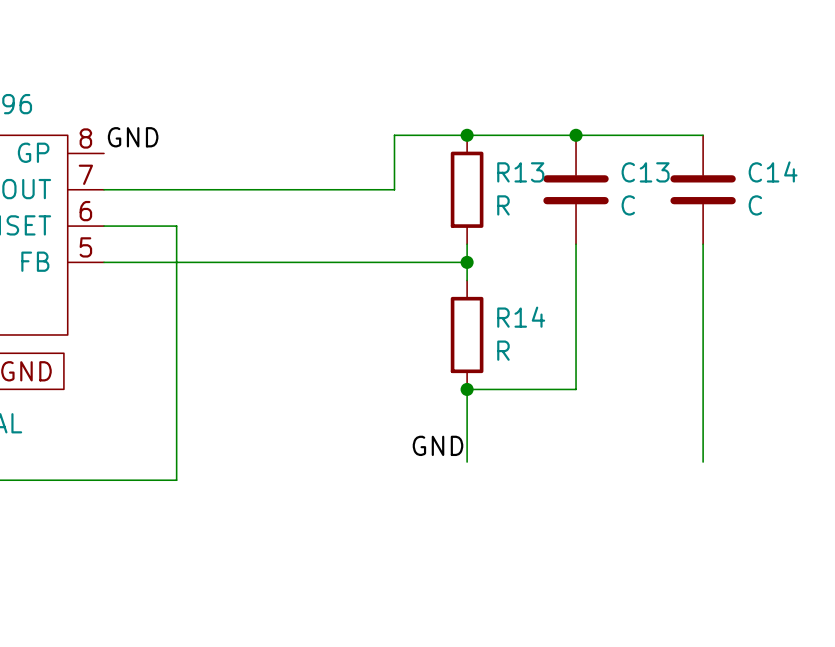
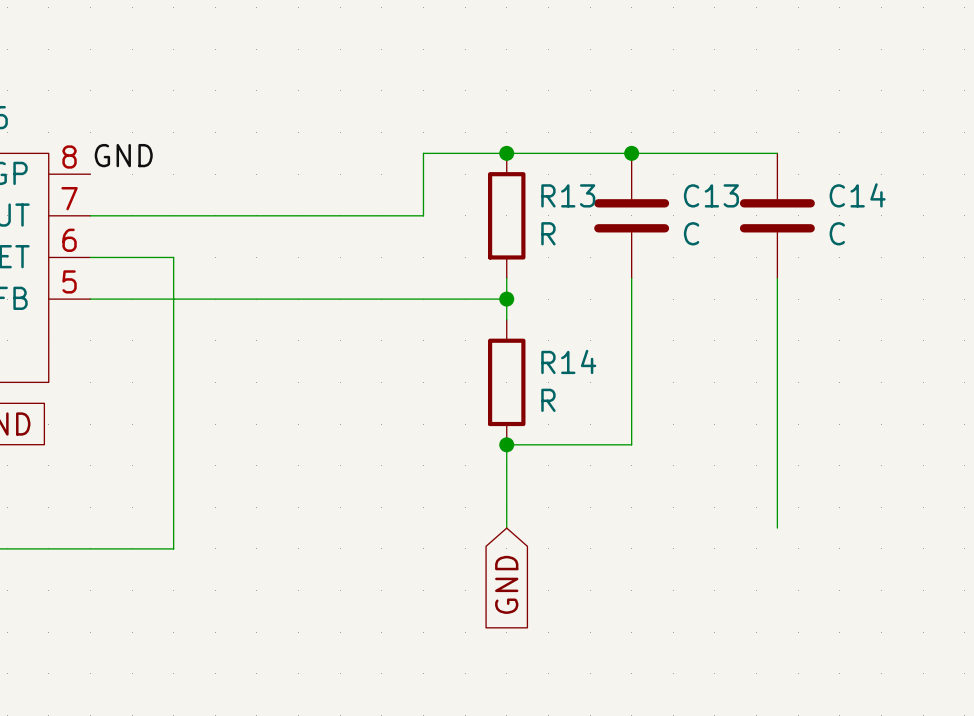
label: GND (438, 445) -> none
global label: none -> GND (506, 584)

